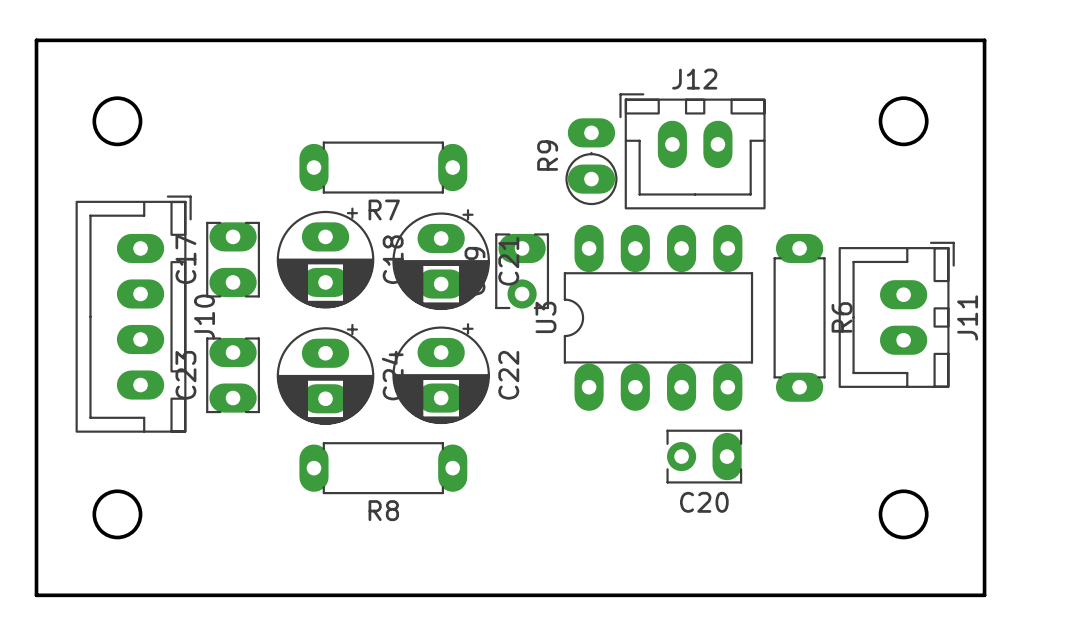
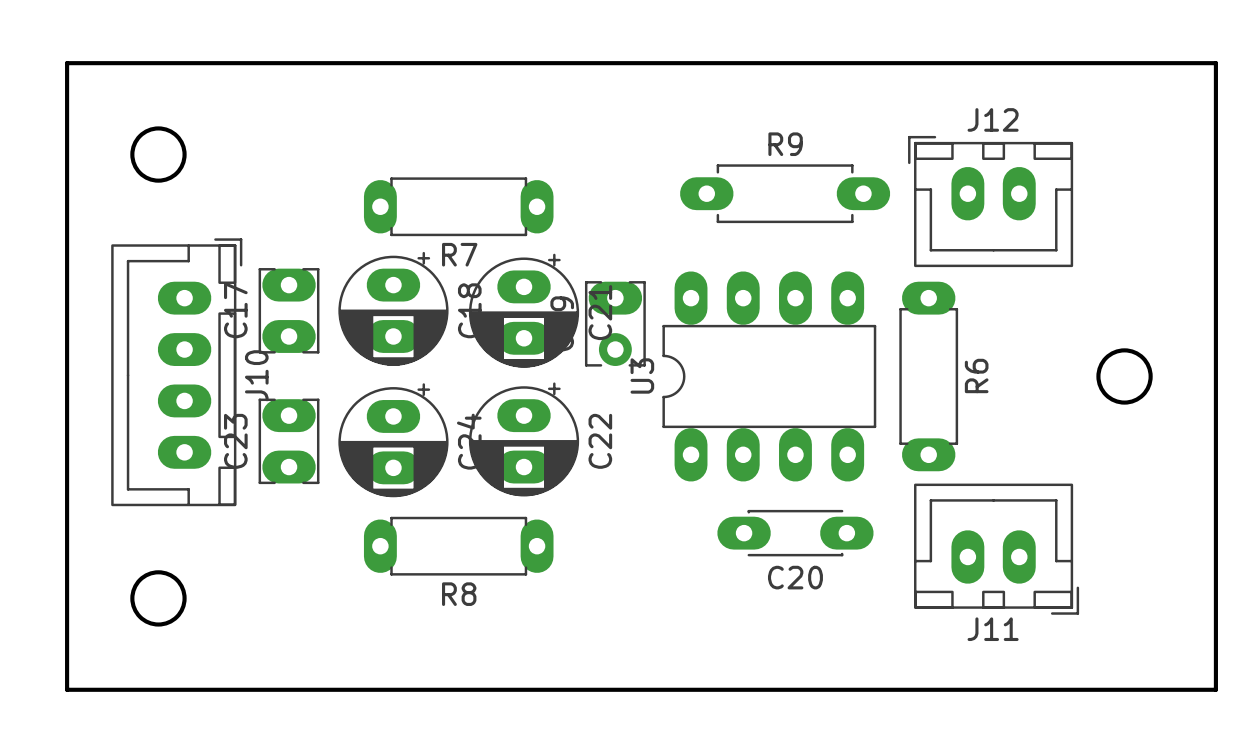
board edge: (984, 40) (984, 595) -> (1137, 63) (1215, 63) (1215, 689) (1137, 689)
round board edge: [878, 96, 929, 147] -> none
R9 footprint: [565, 118, 618, 206] -> [680, 164, 891, 224]
J12 position: (692, 151) -> (990, 201)
R9 name position: R9 (547, 155) -> R9 (785, 144)
round board edge: none -> [1096, 348, 1153, 405]
J11 rotation: 0° (896, 314) -> 90° clockwise (996, 549)
J11 position: (896, 314) -> (996, 549)
C20 footprint: [666, 429, 743, 484] -> [717, 509, 874, 557]
round board edge: [878, 489, 929, 540] -> none

